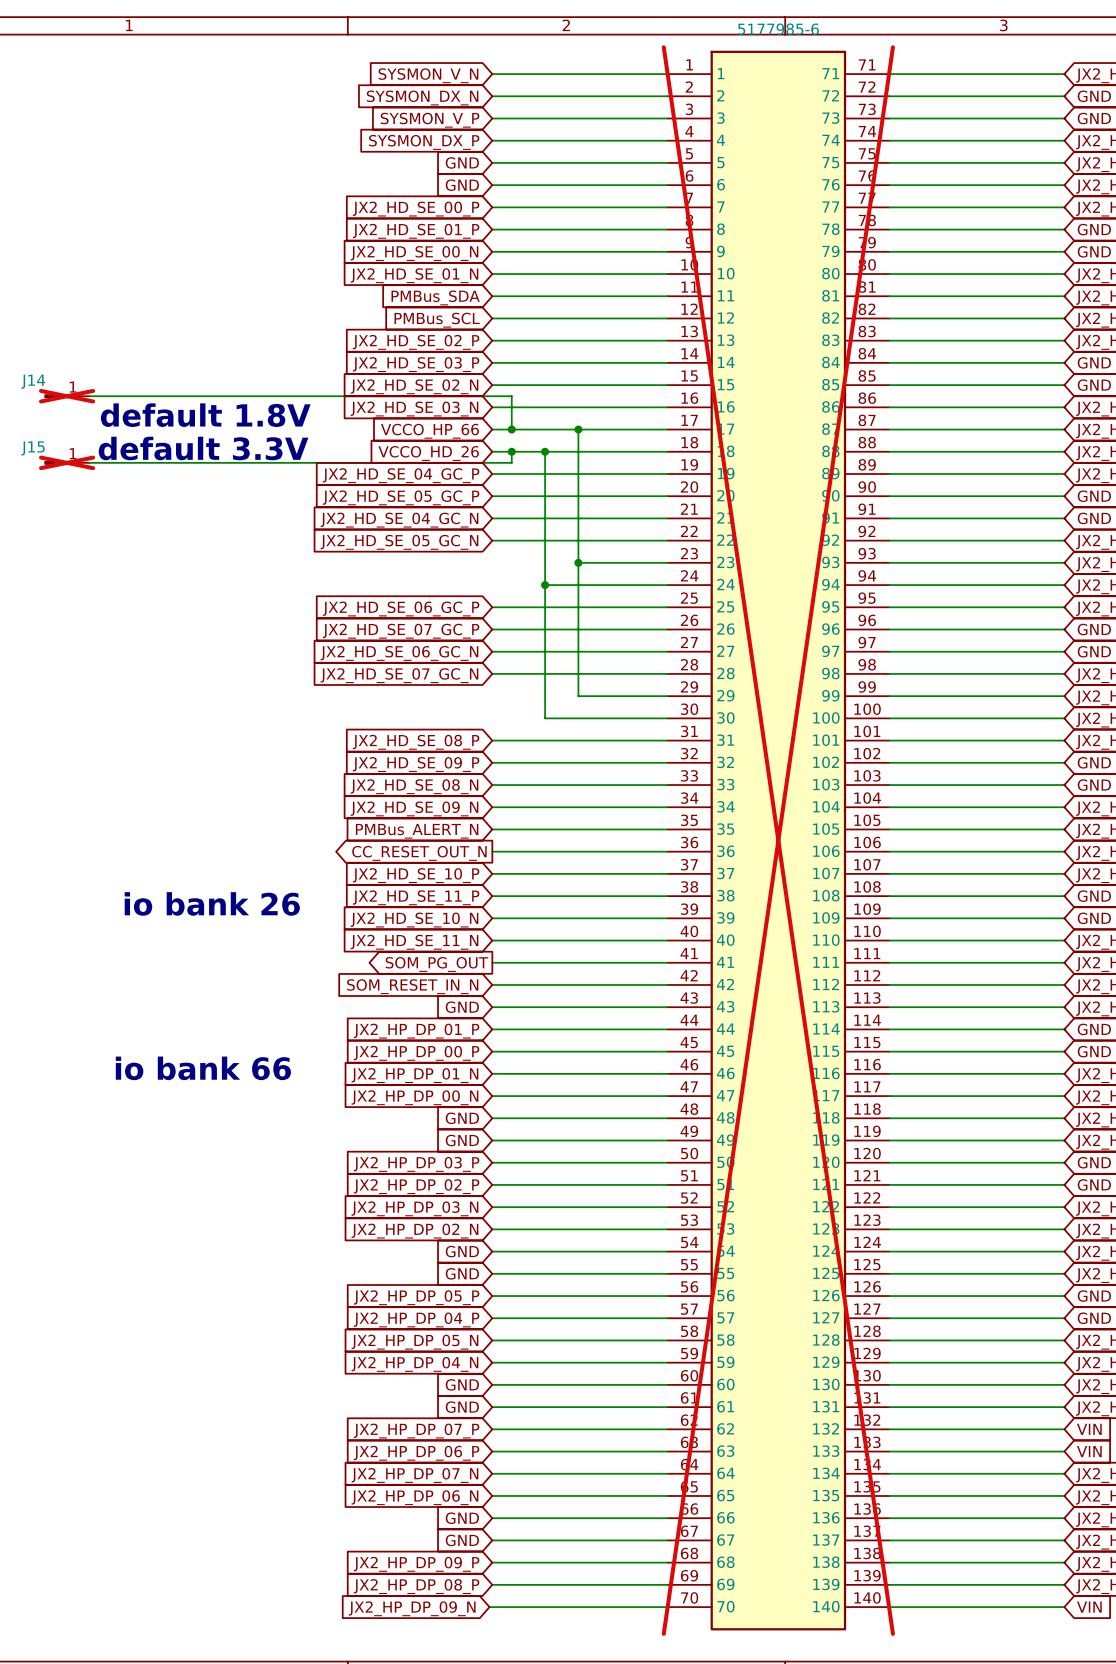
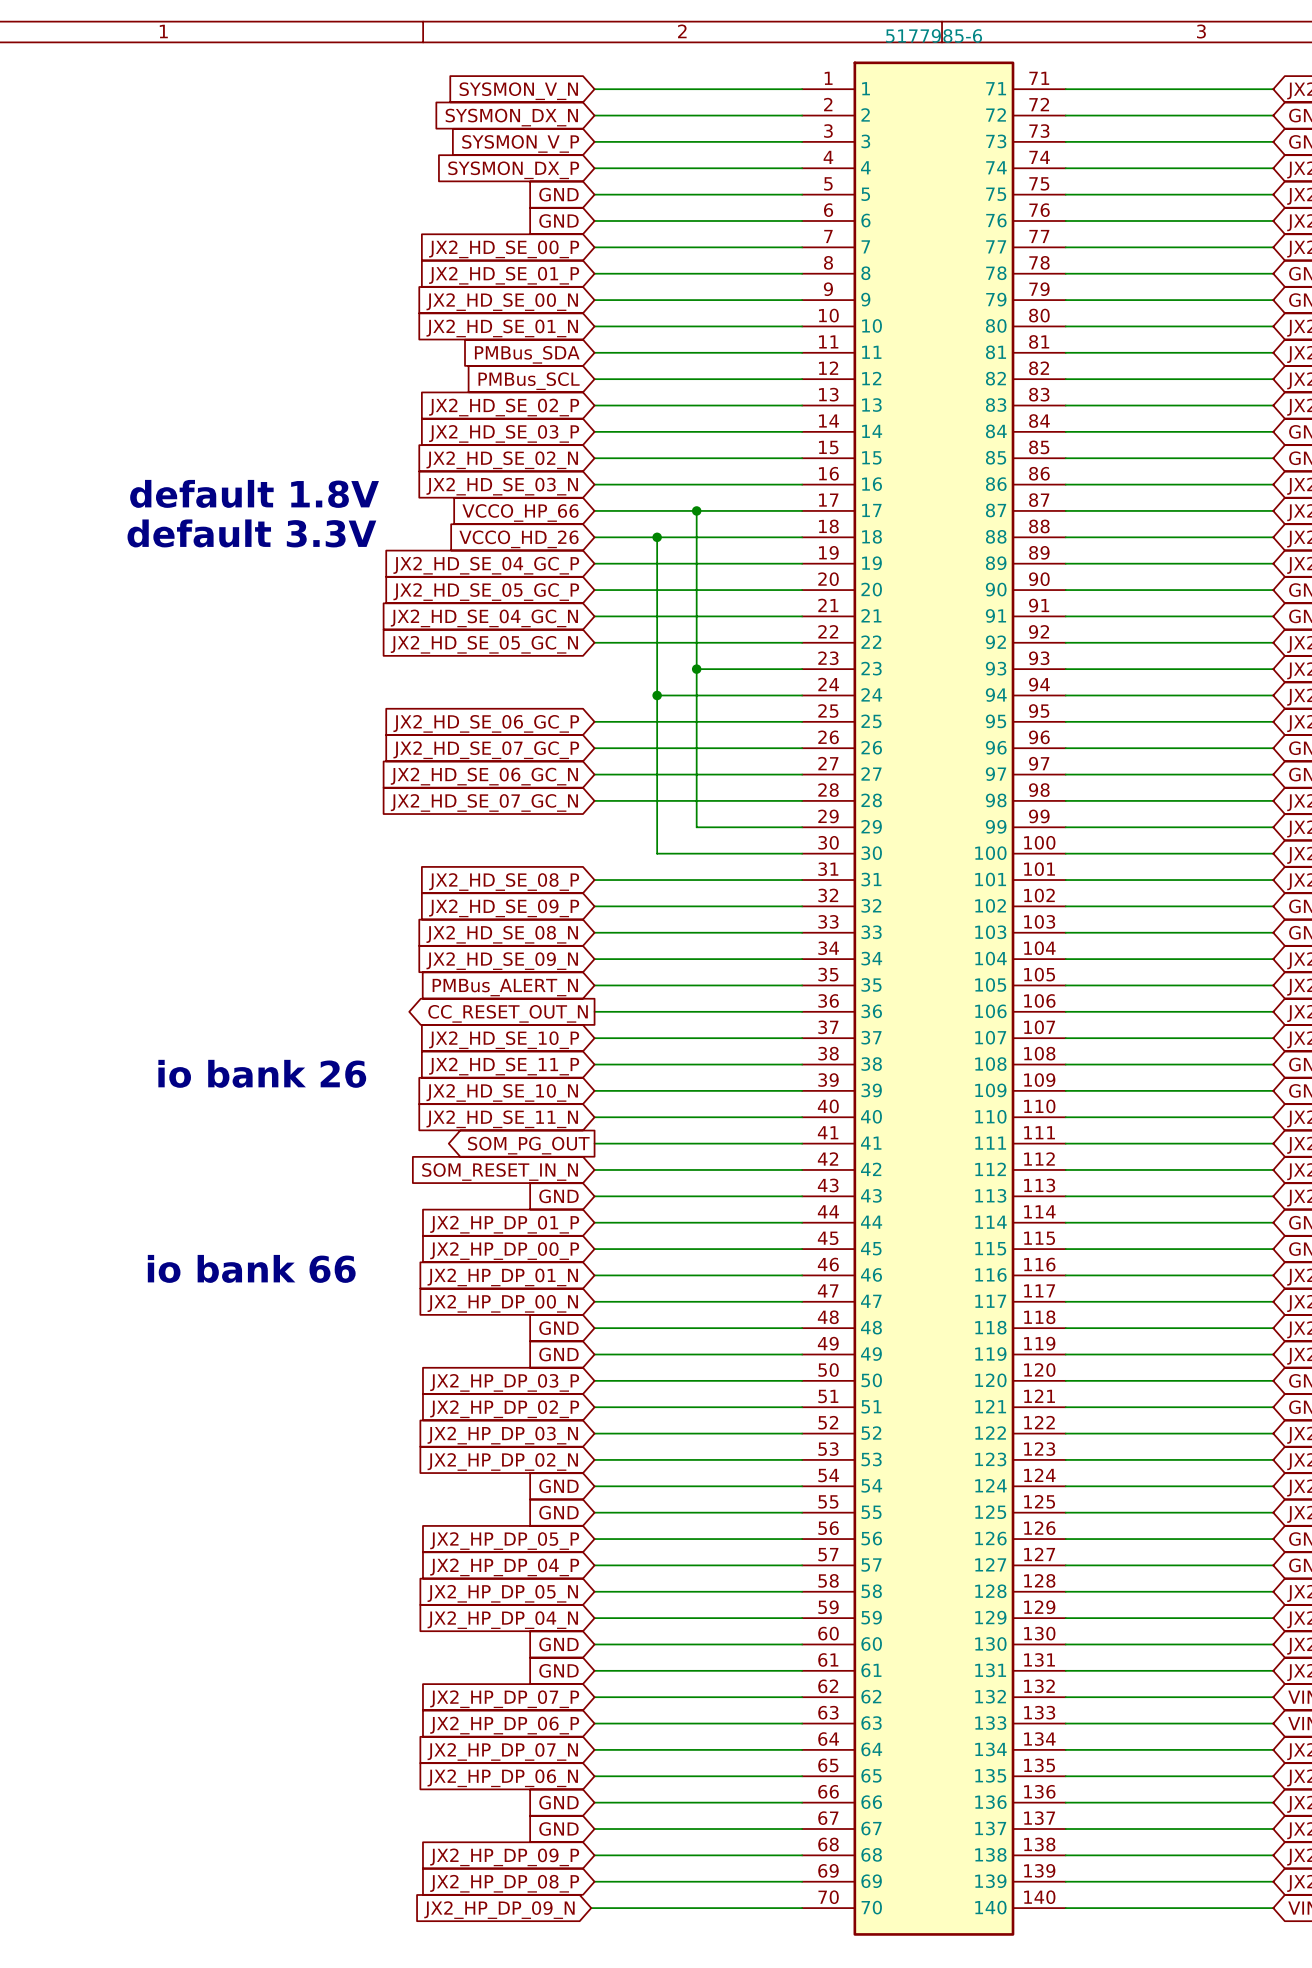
J14: (67, 396) -> none
wire: (89, 396) (511, 396) (511, 429) -> none
junction: (511, 429) -> none
wire: (511, 451) (511, 462) (89, 462) -> none
junction: (511, 451) -> none
J15: (67, 462) -> none
part do-not-place cross: (778, 840) -> none

